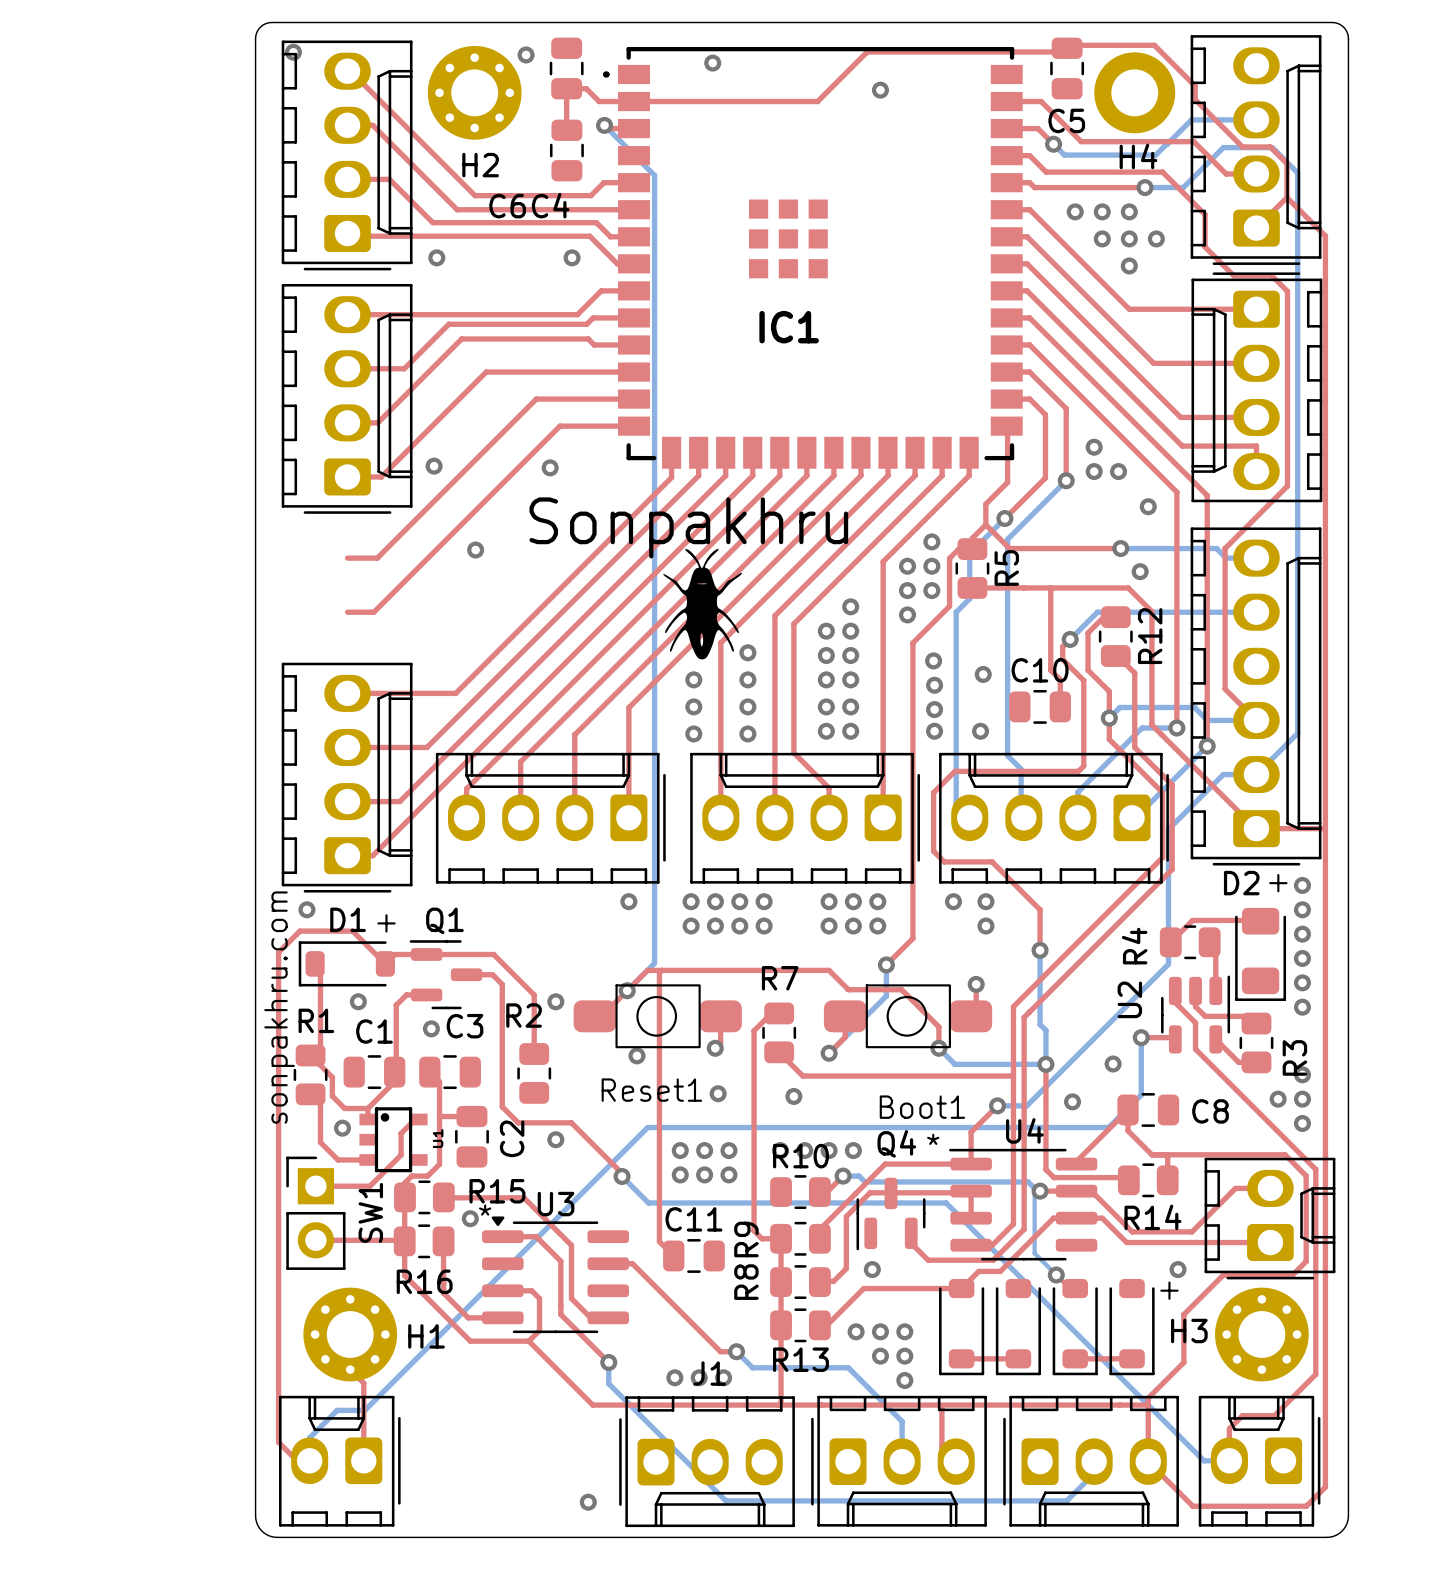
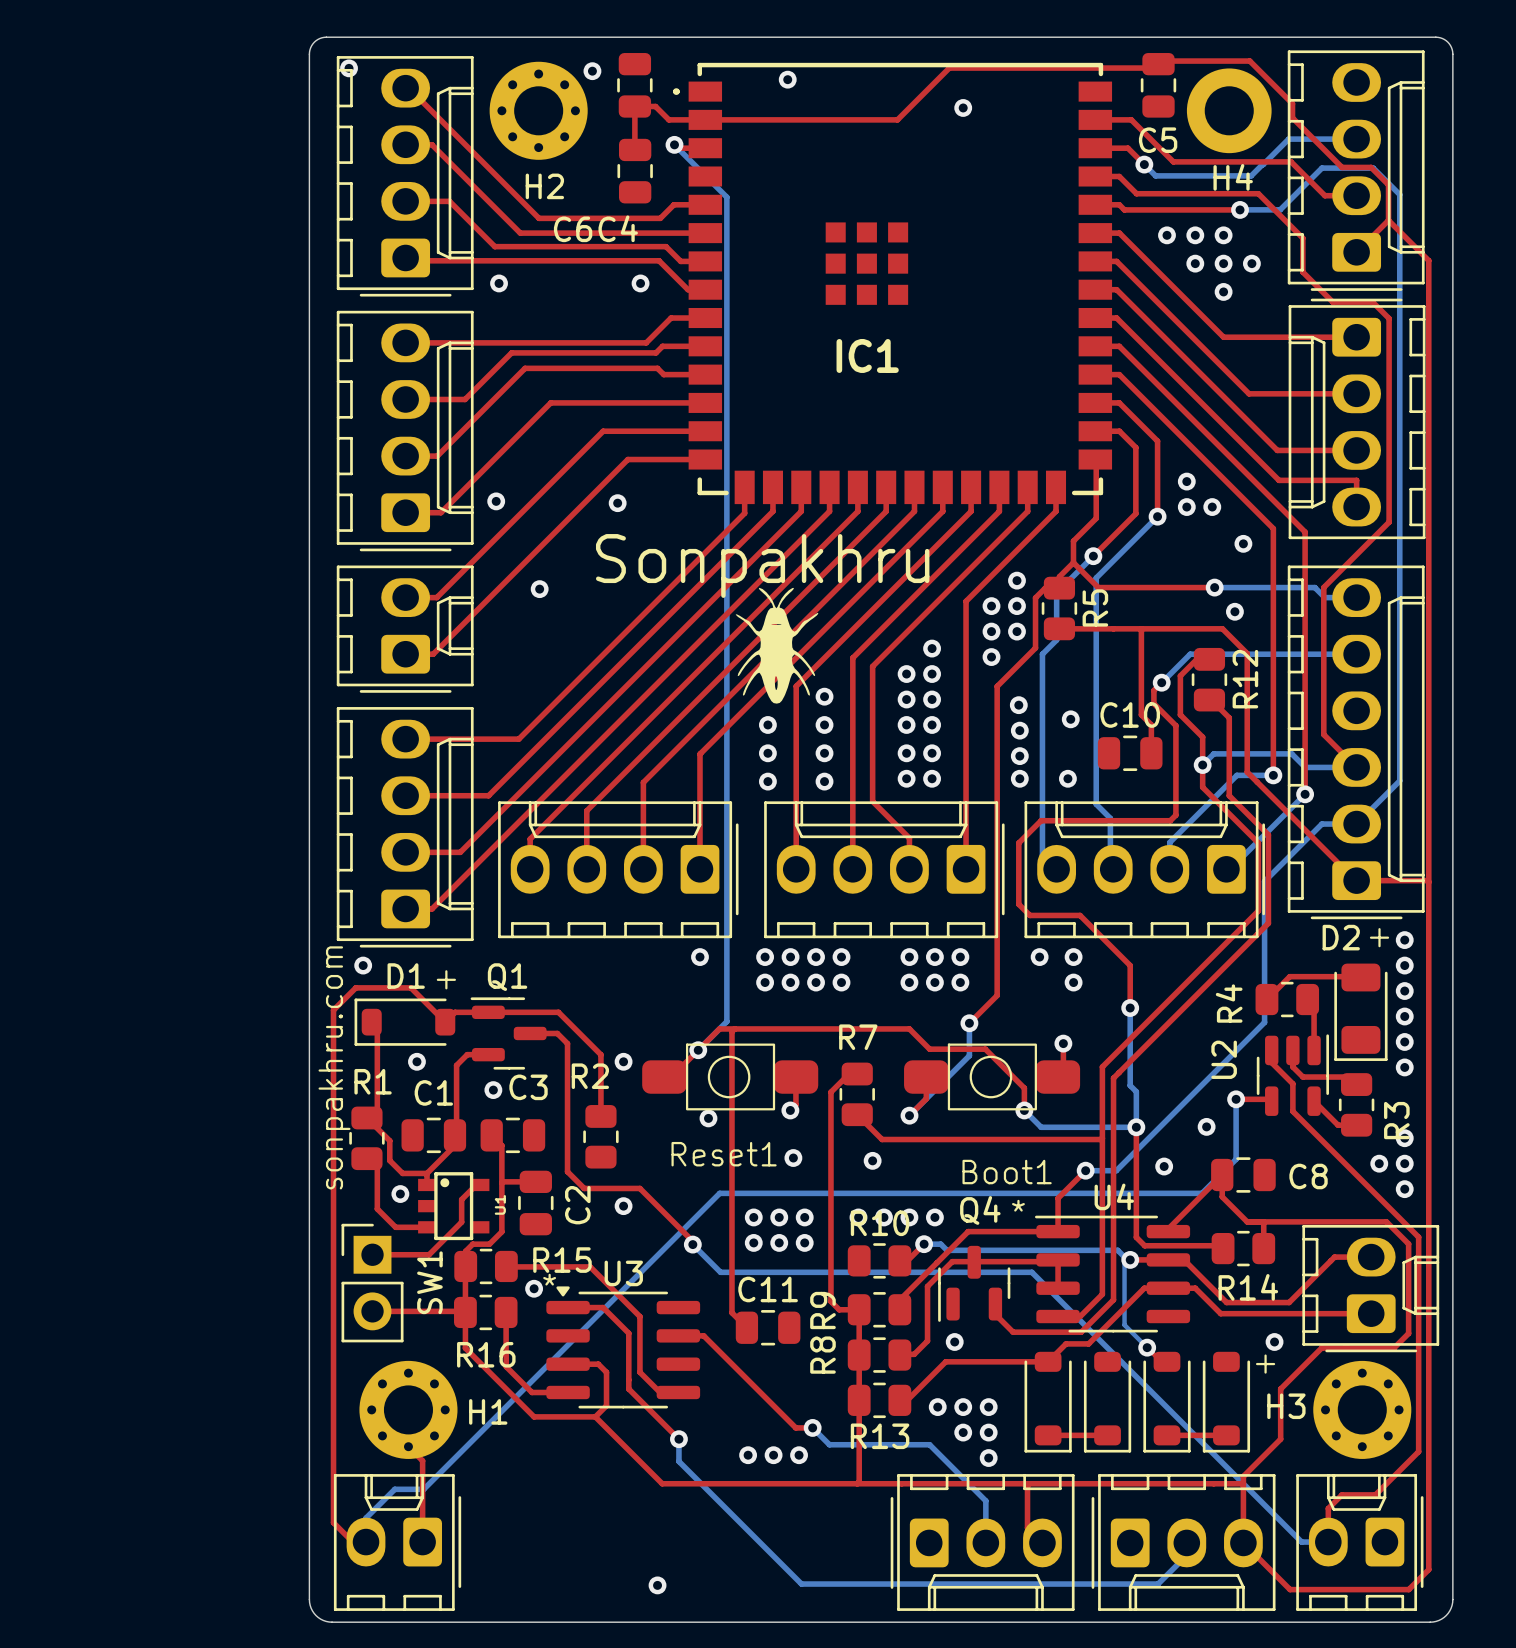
part: none -> (405, 629)
J1: (707, 1461) -> none

